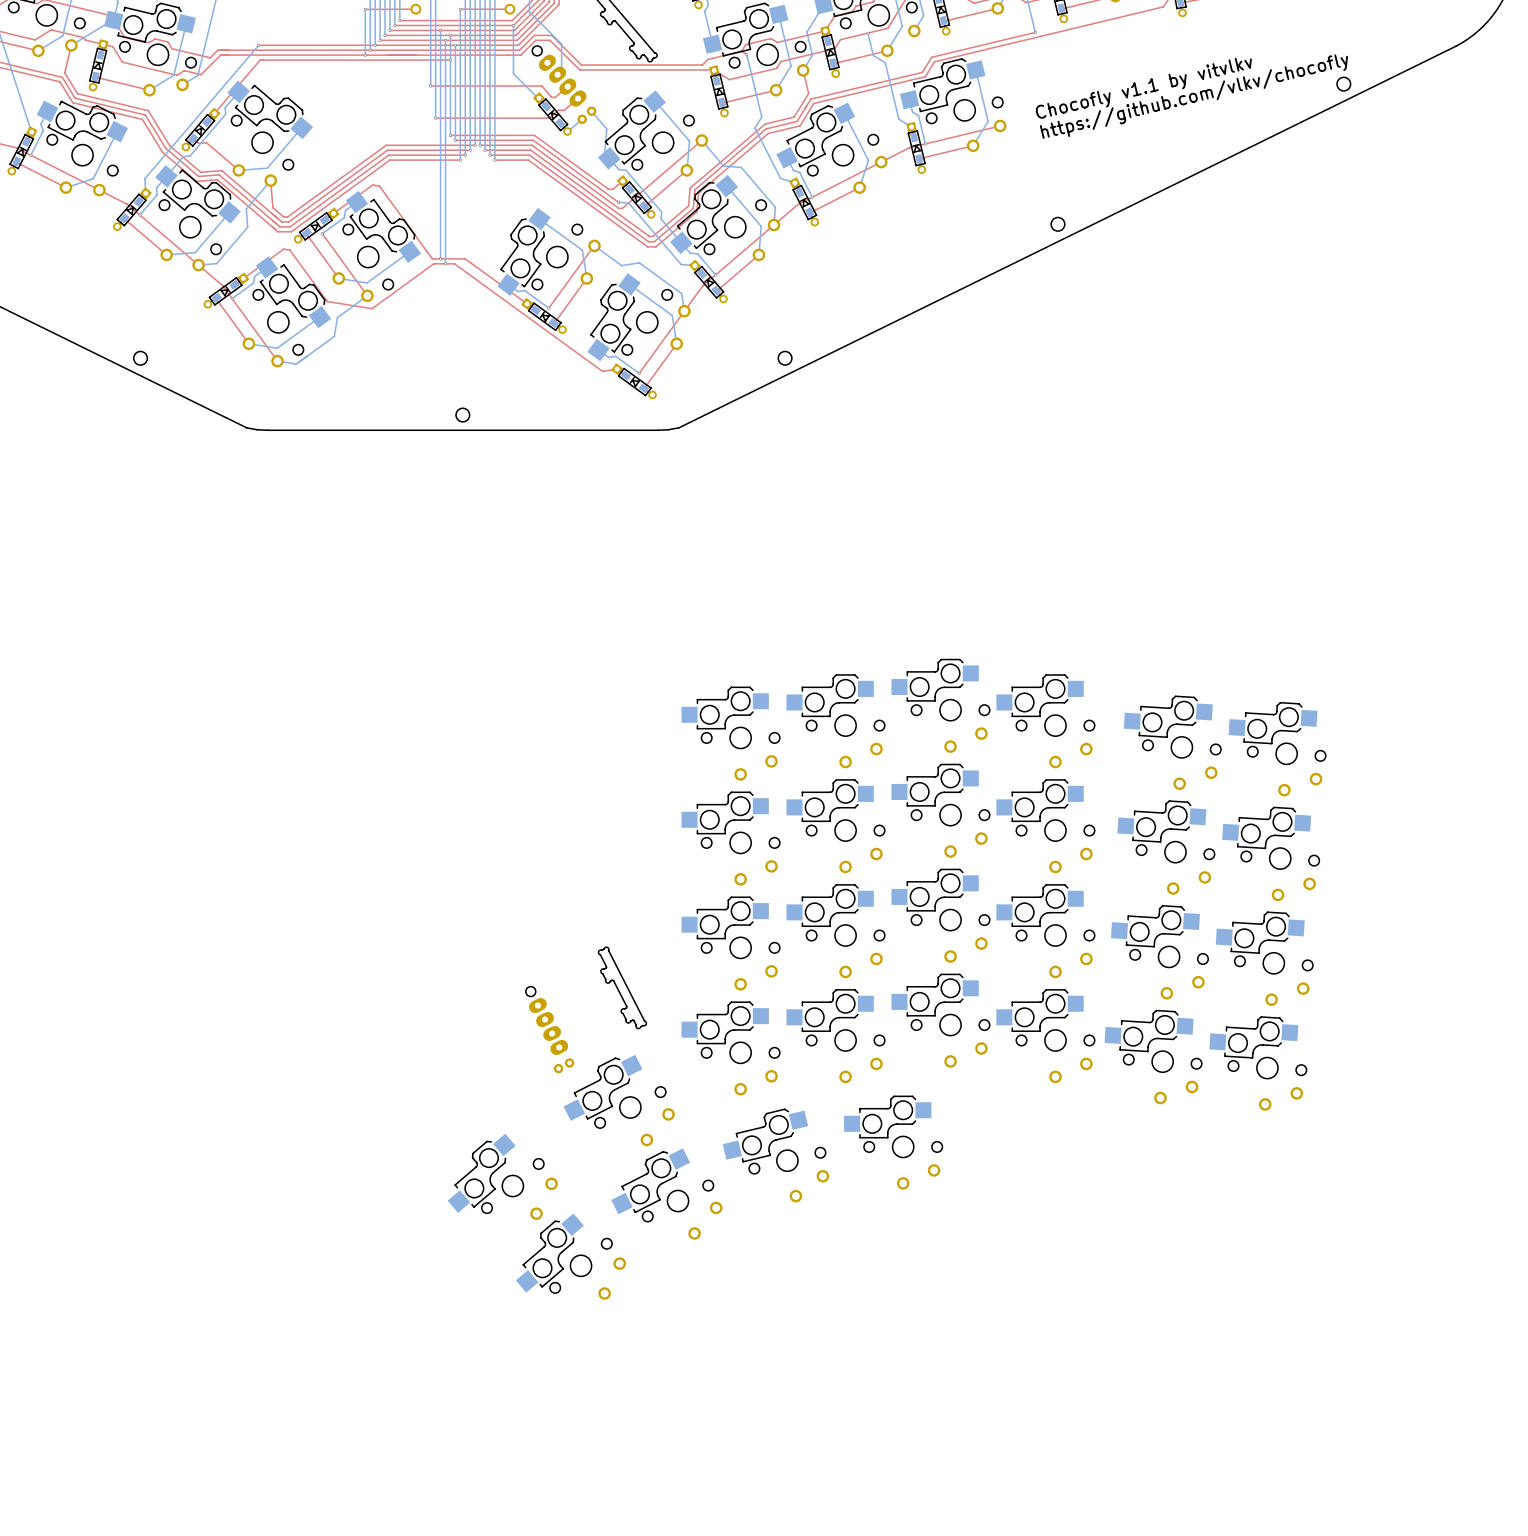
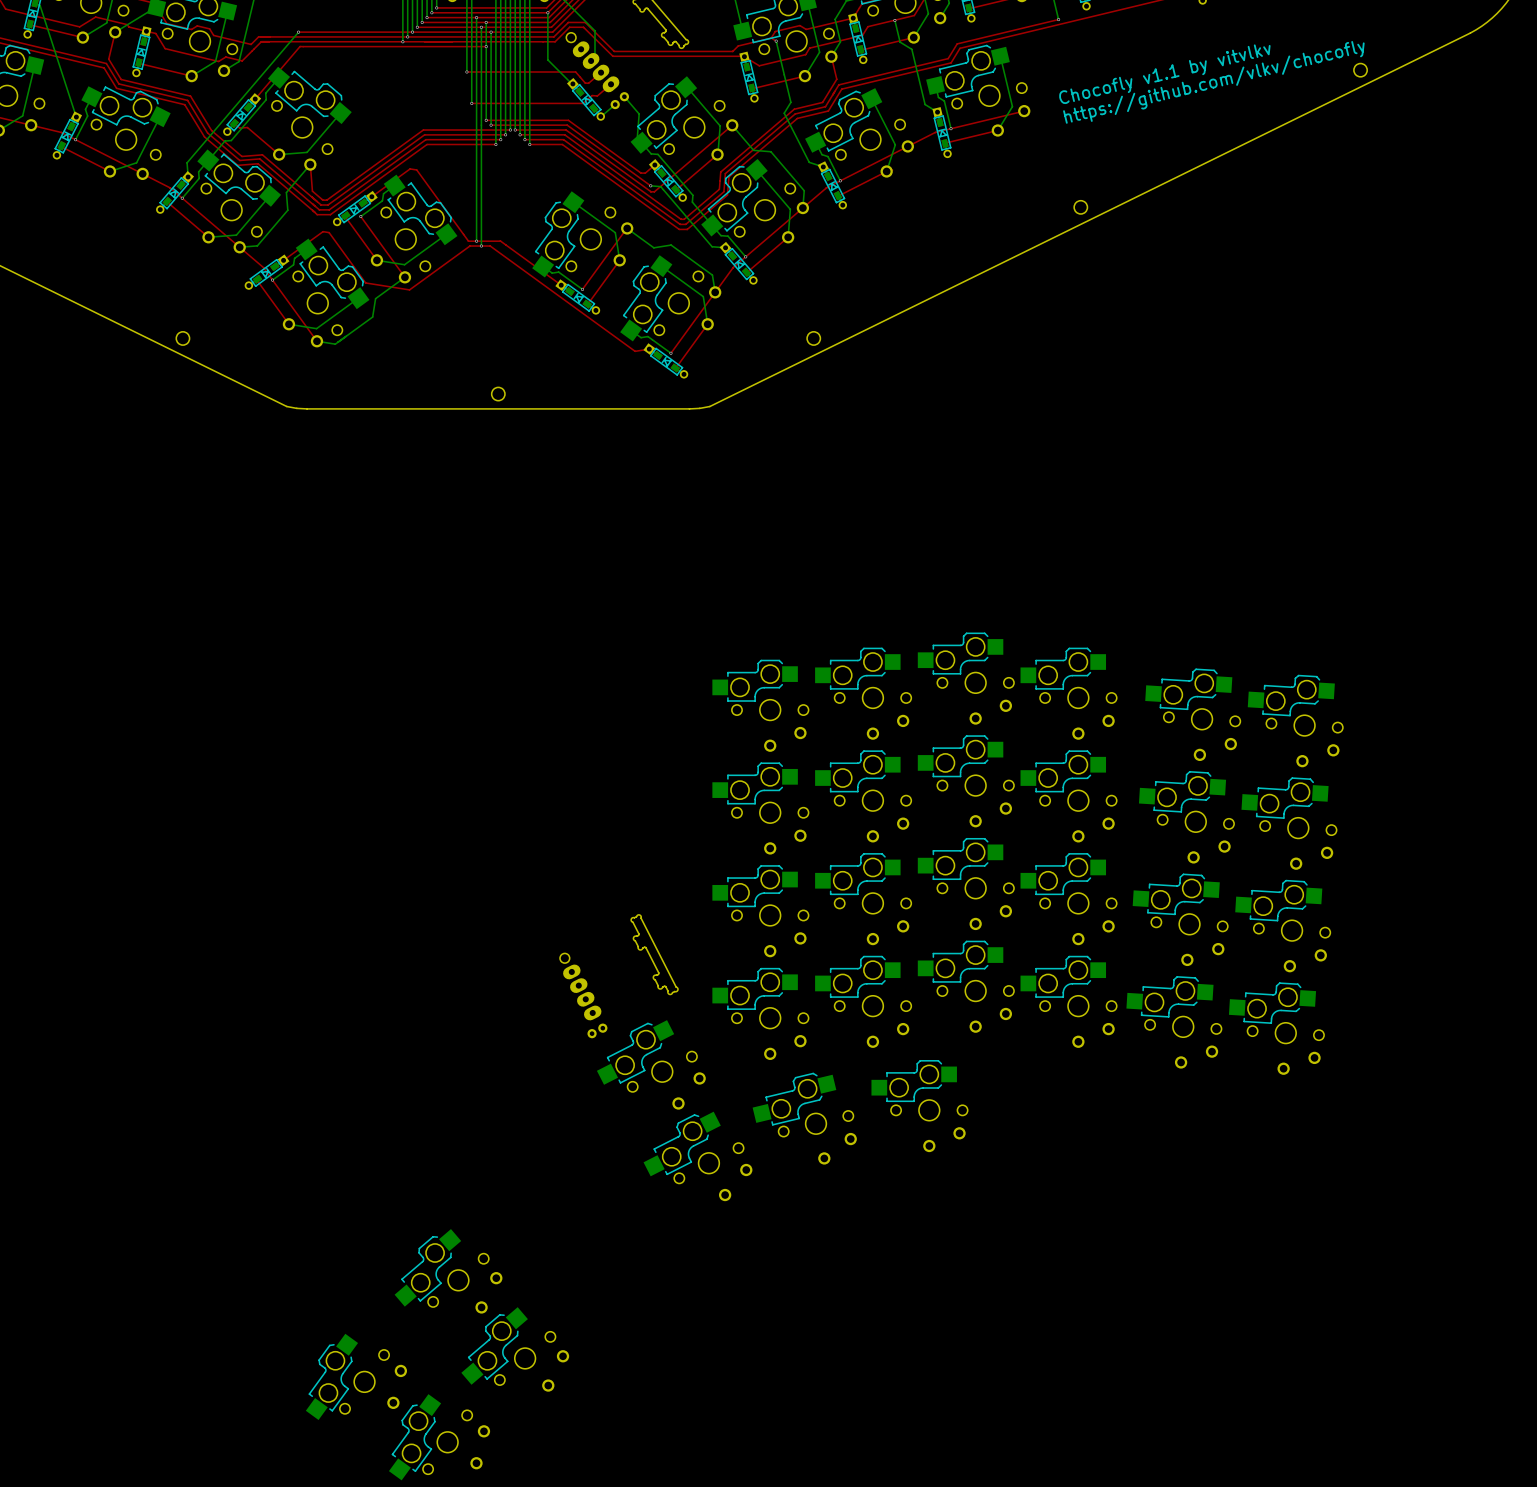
part: (502, 1176) -> none
part: (570, 1256) -> none
part: none -> (448, 1271)
part: none -> (515, 1349)
part: none -> (356, 1376)
part: none -> (439, 1437)

